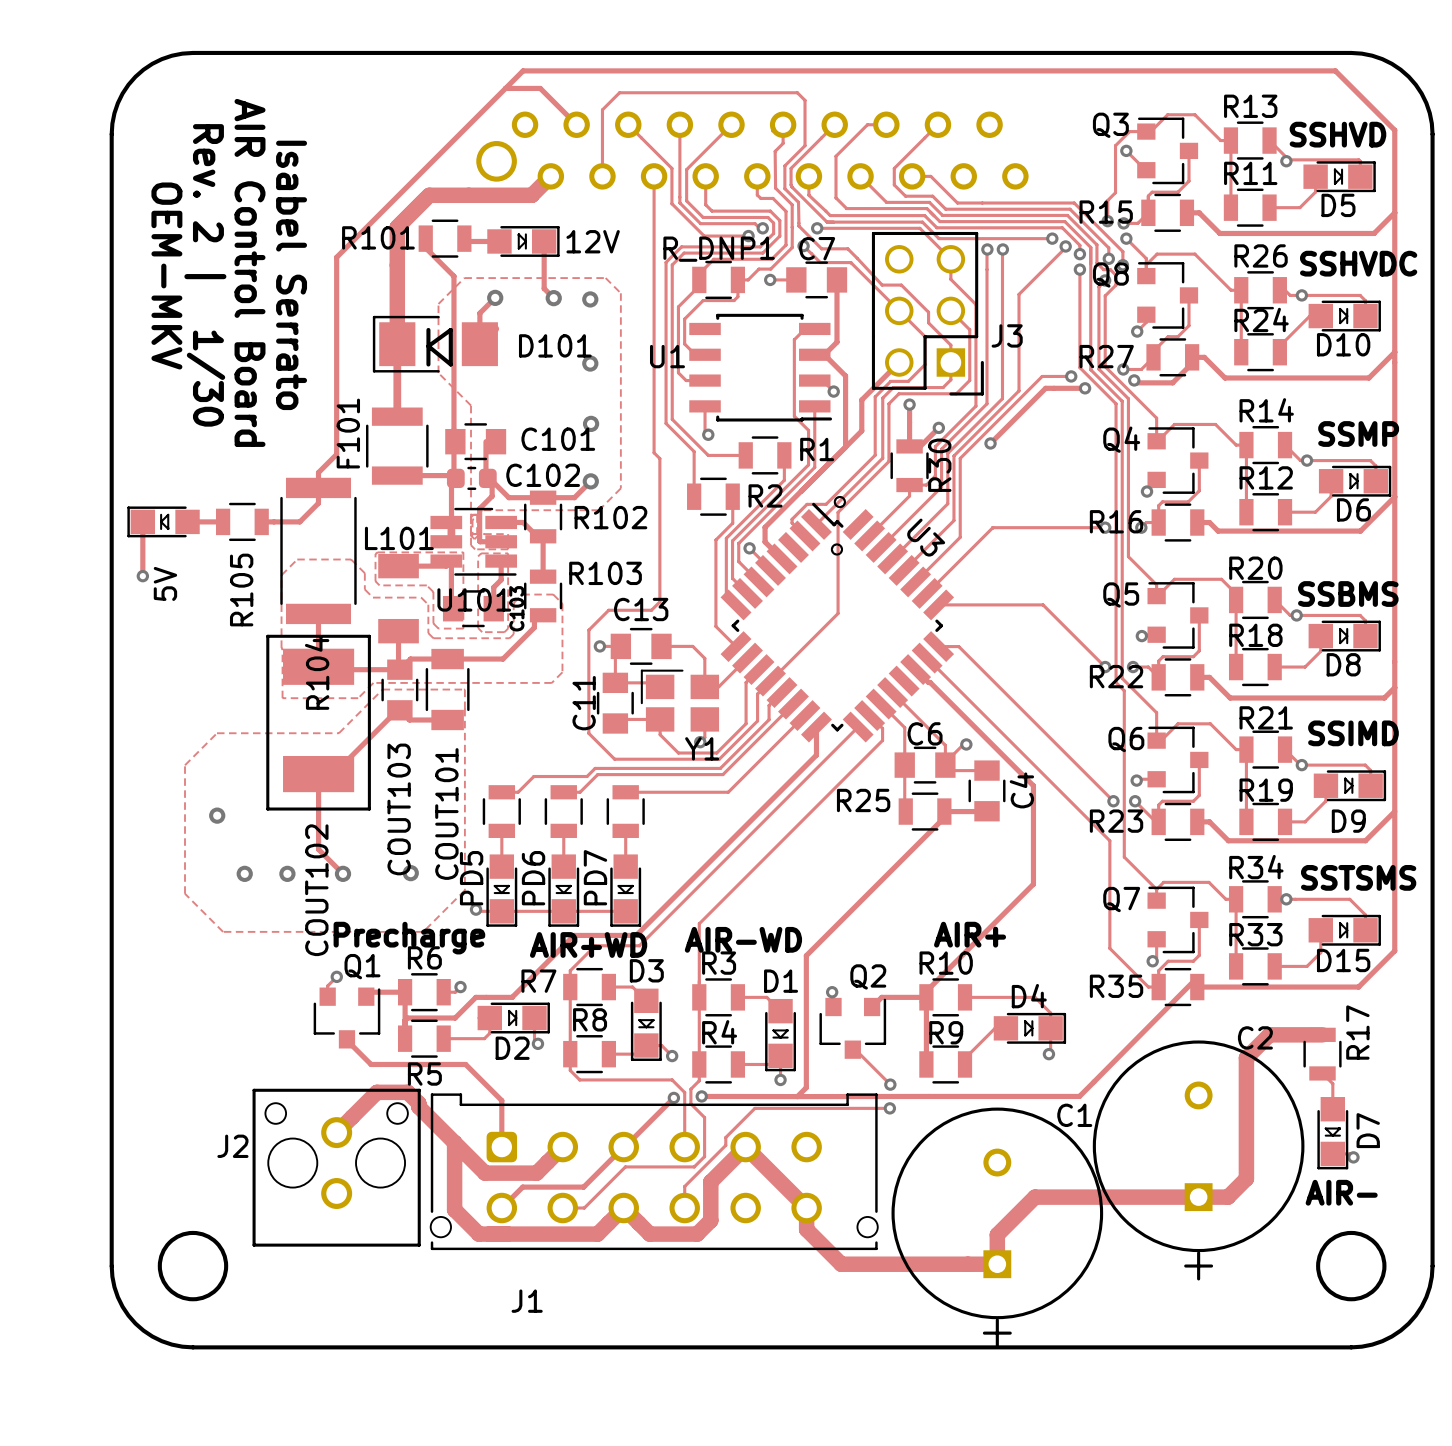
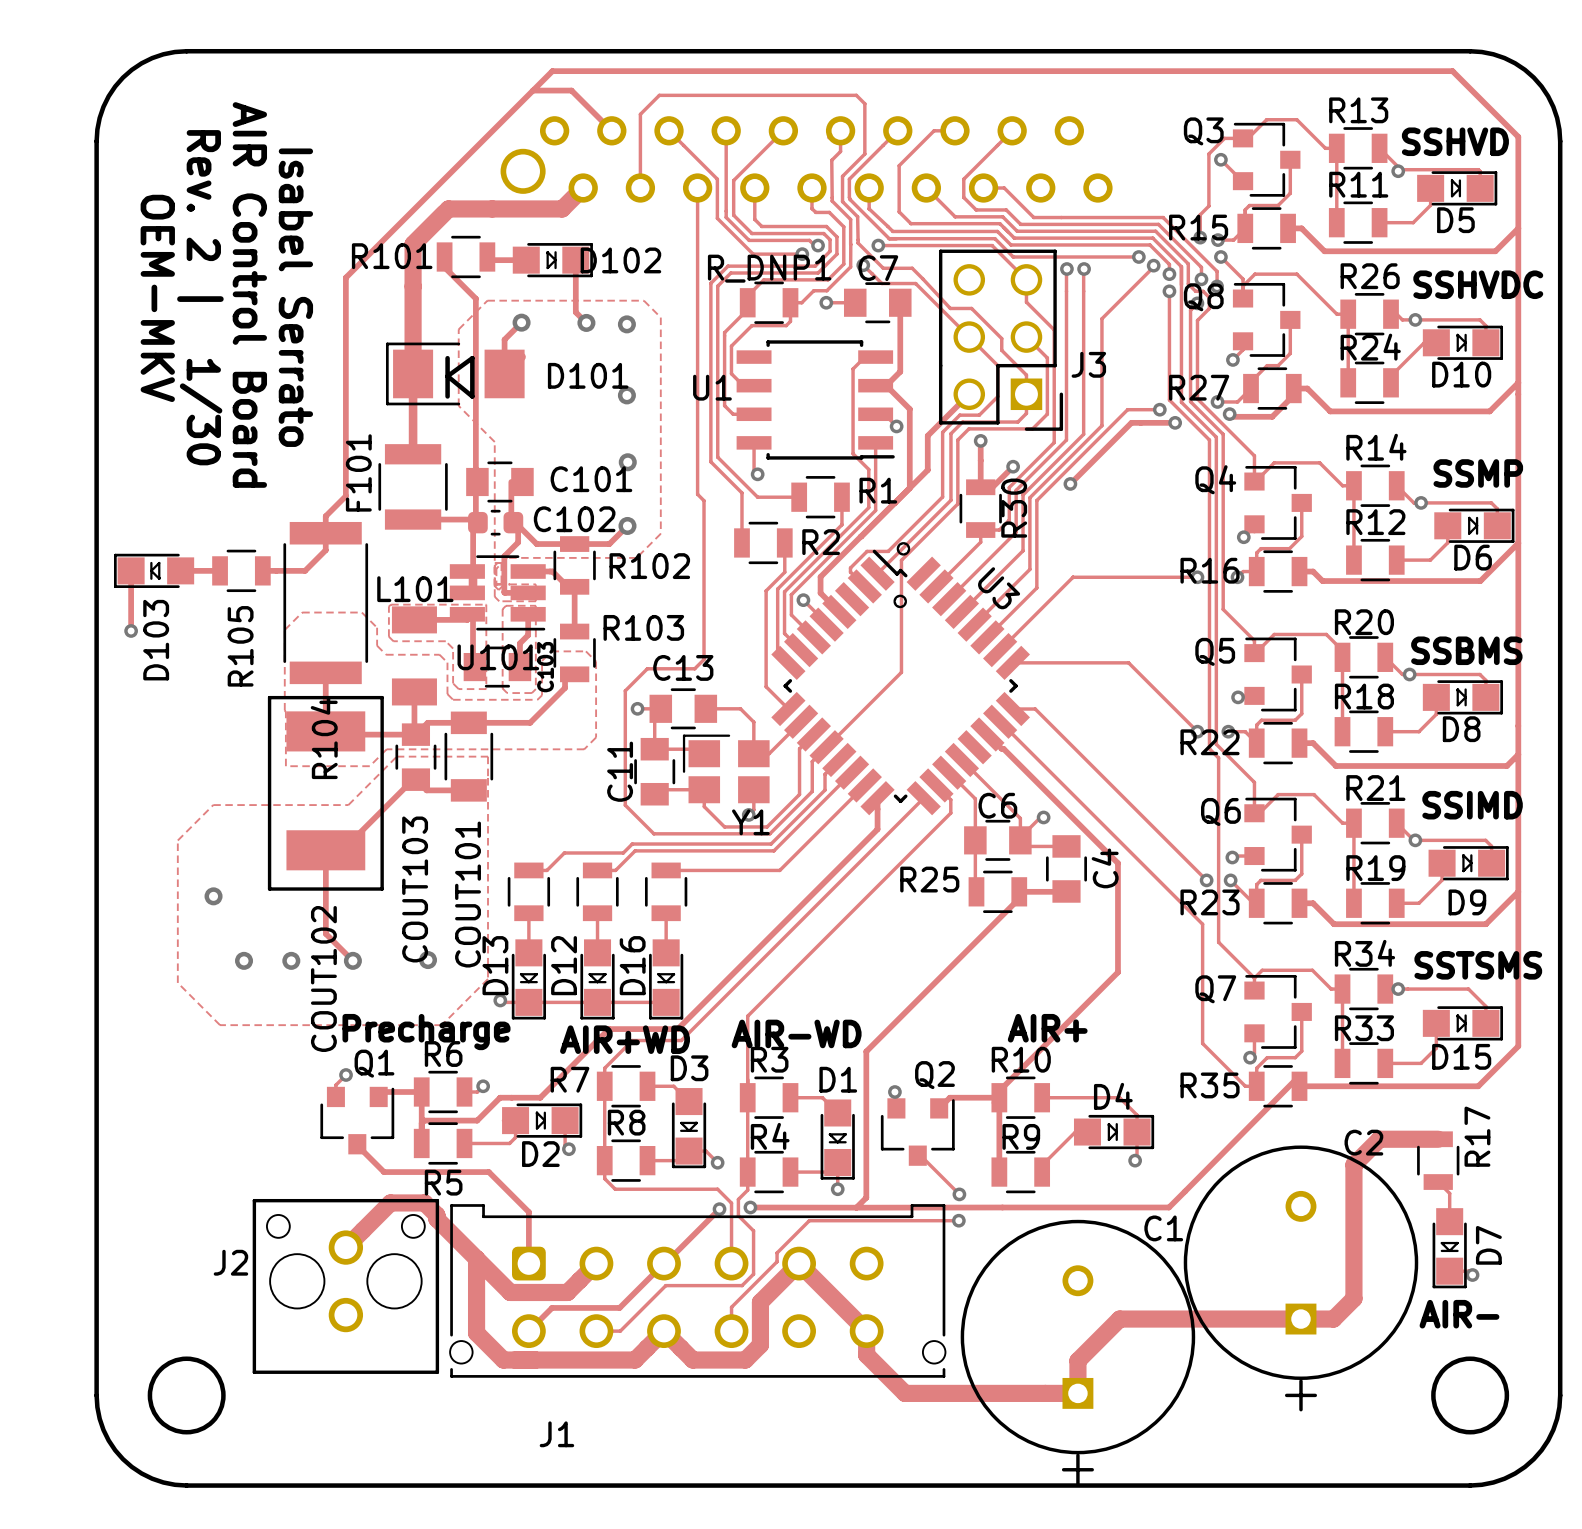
12V name: 12V (593, 241) -> D102 (620, 260)
5V name: 5V (165, 583) -> D103 (156, 640)
PD7 name: PD7 (595, 877) -> D16 (632, 965)
PD5 name: PD5 (471, 878) -> D13 (495, 965)
PD6 name: PD6 (533, 878) -> D12 (564, 965)

